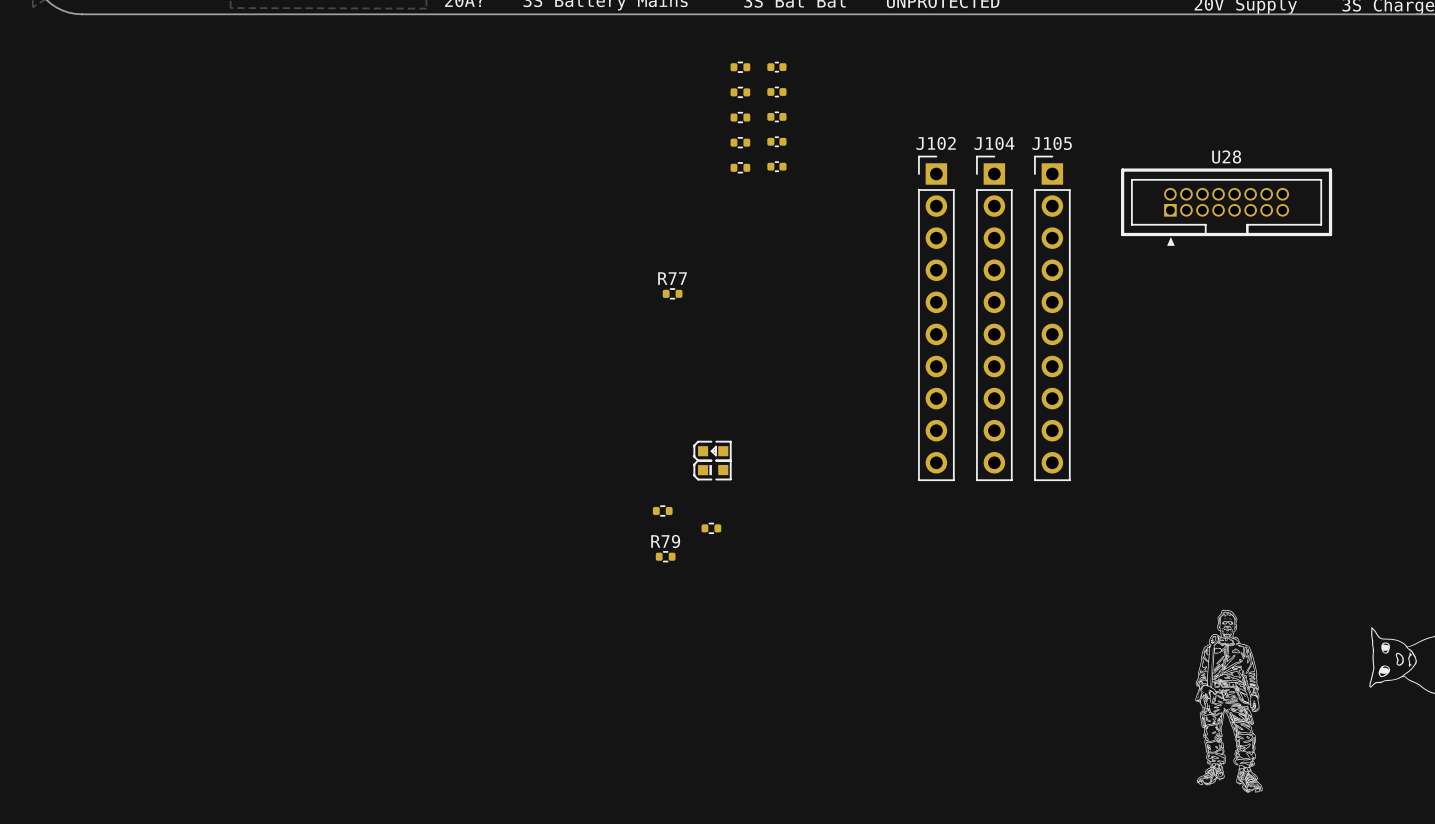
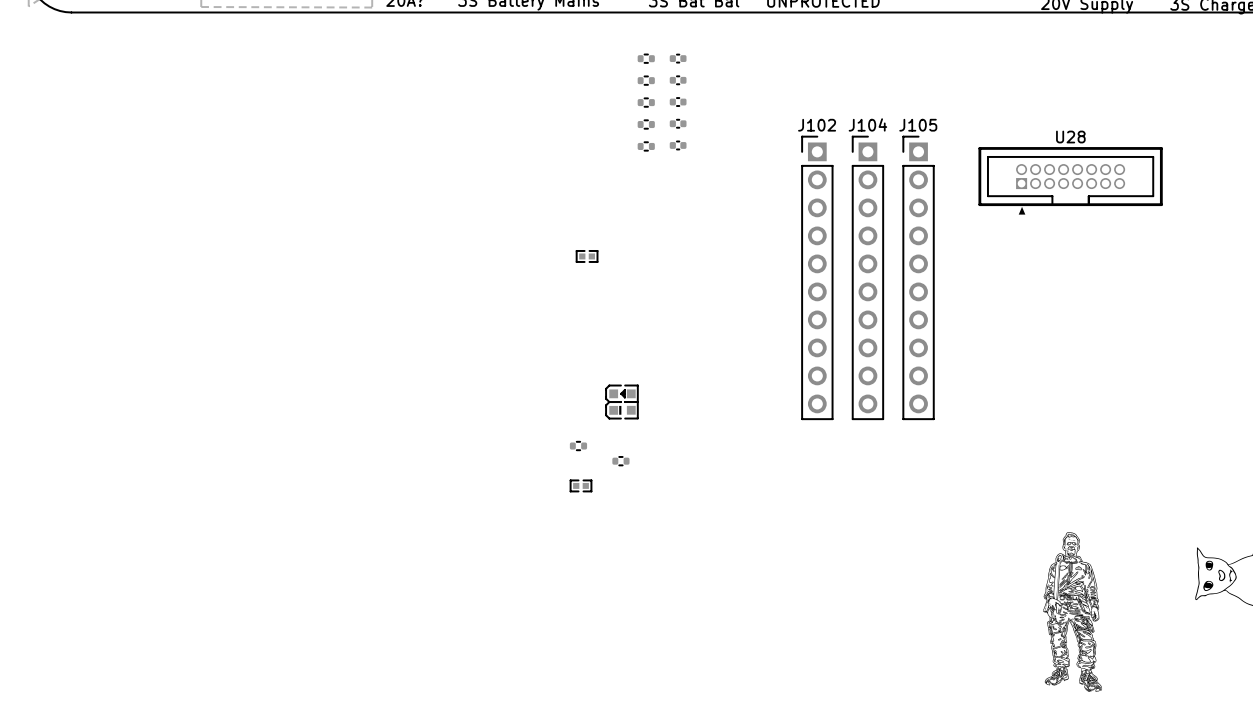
R77: (672, 293) -> none
part: none -> (587, 256)
R79: (665, 556) -> none
part: none -> (581, 485)

